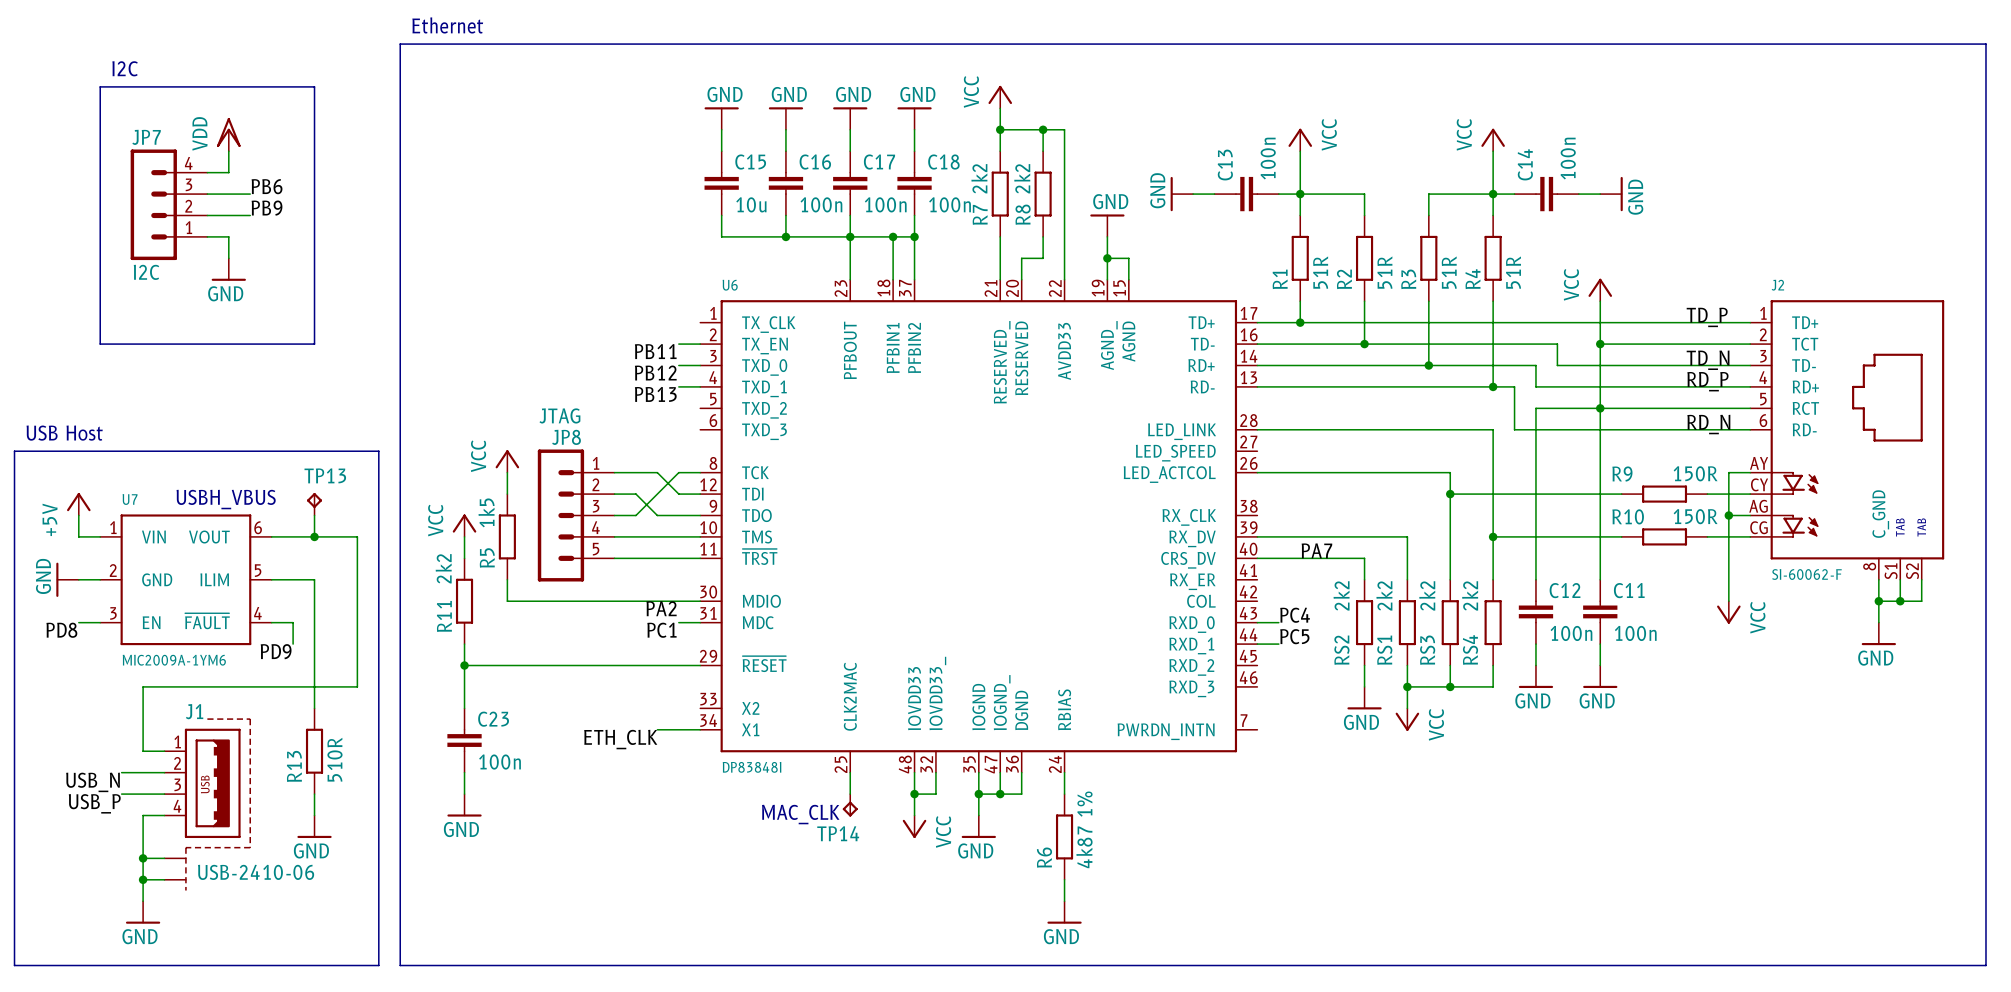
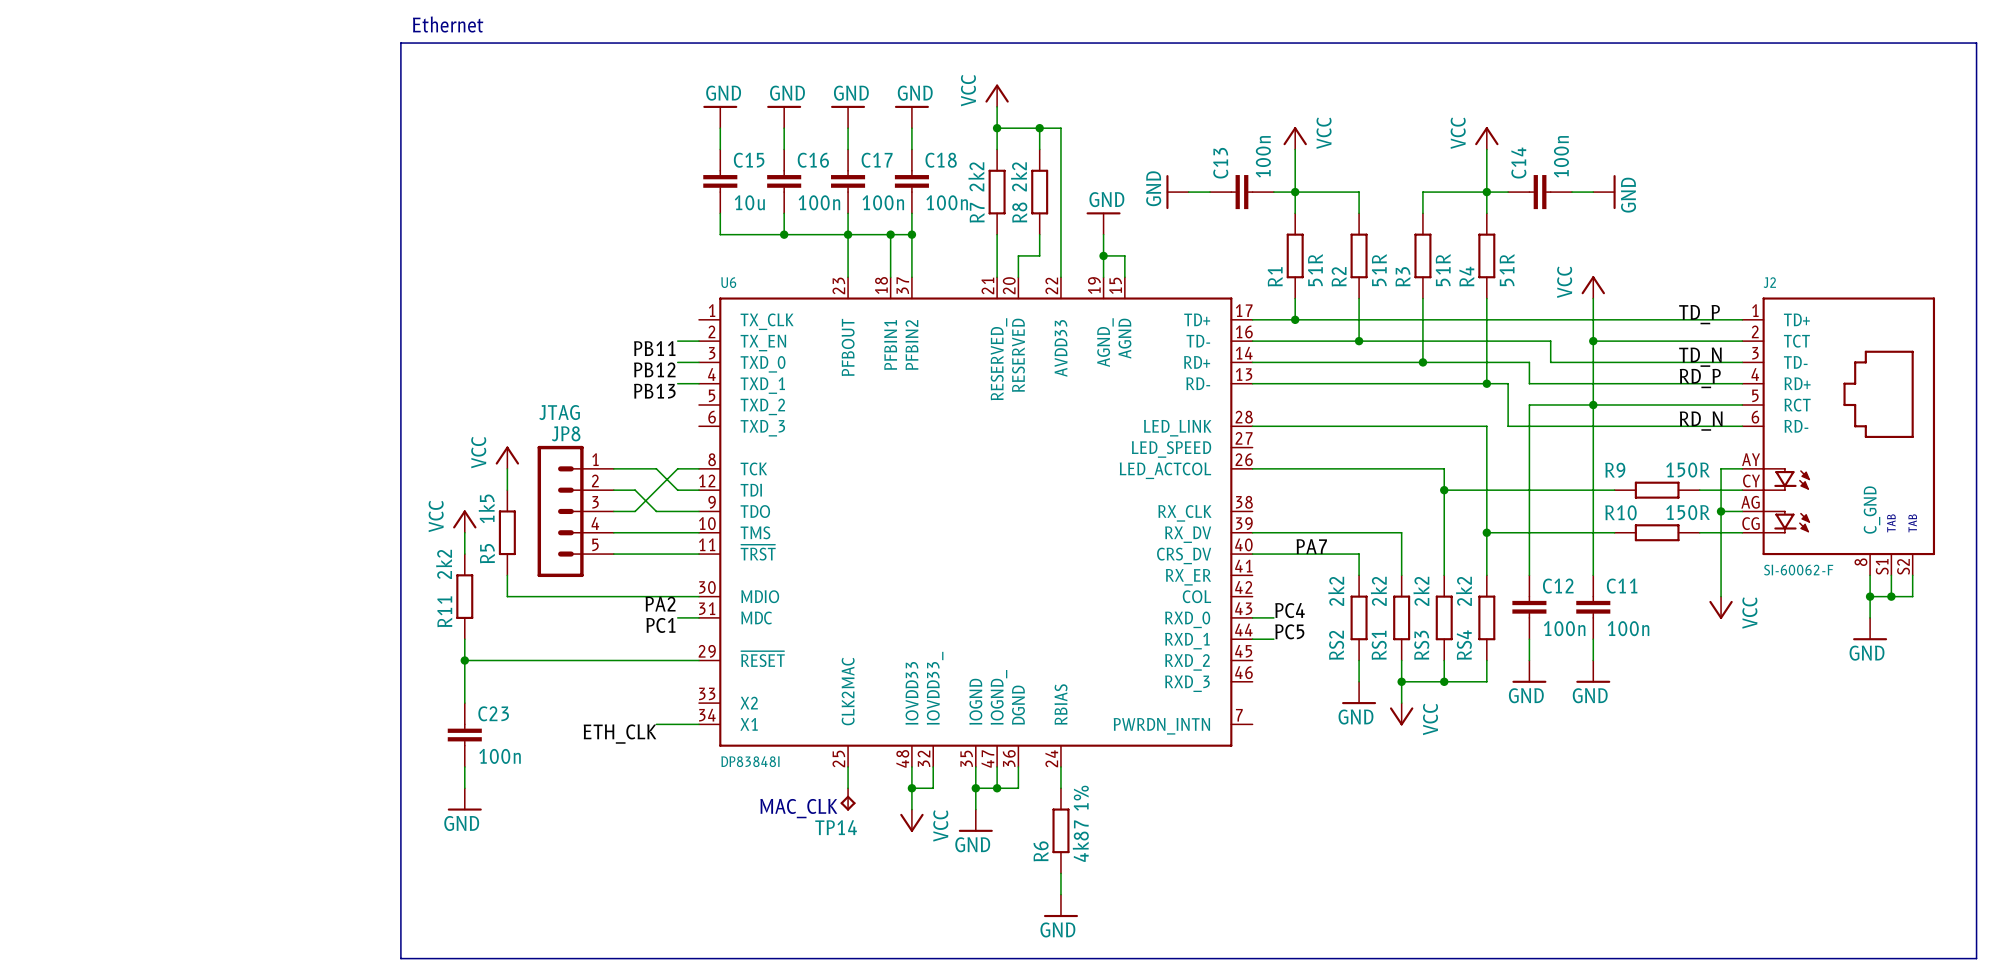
text: I2C (125, 68) -> none
line: (100, 86) (100, 344) (314, 344) (314, 86) (100, 86) -> none
power symbol: VDD (228, 134) -> none
wire: (228, 151) (228, 172) (207, 172) -> none
label: PB6 (267, 186) -> none
wire: (207, 194) (250, 194) -> none
JP7: I2C (169, 204) -> none
label: PB9 (267, 208) -> none
wire: (207, 215) (250, 215) -> none
wire: (207, 236) (228, 236) (228, 258) -> none
power symbol: GND (228, 269) -> none
text: USB Host (64, 433) -> none
line: (14, 451) (378, 451) (378, 965) (14, 965) (14, 451) -> none
power symbol: +5V (78, 504) -> none
TP13: (314, 504) -> none
wire: (78, 515) (78, 536) (100, 536) -> none
wire: (314, 515) (314, 536) -> none
wire: (271, 536) (357, 536) (357, 686) (143, 686) (143, 751) (164, 751) -> none
junction: (314, 536) -> none
power symbol: GND (67, 579) -> none
wire: (78, 579) (100, 579) -> none
U7: MIC2009A-1YM6 (185, 579) -> none
wire: (271, 579) (314, 579) (314, 708) -> none
wire: (78, 622) (100, 622) -> none
wire: (271, 622) (293, 622) (293, 644) -> none
label: PD8 (61, 630) -> none
label: PD9 (276, 651) -> none
R13: 510R (314, 751) -> none
wire: (121, 772) (164, 772) -> none
label: USB_N (92, 782) -> none
wire: (121, 794) (164, 794) -> none
wire: (314, 794) (314, 815) -> none
label: USB_P (94, 803) -> none
J1: USB-2410-06 (207, 804) -> none
wire: (164, 815) (143, 815) (143, 901) -> none
power symbol: GND (314, 826) -> none
wire: (143, 858) (164, 858) -> none
junction: (143, 858) -> none
wire: (143, 879) (164, 879) -> none
junction: (143, 879) -> none
power symbol: GND (143, 912) -> none

